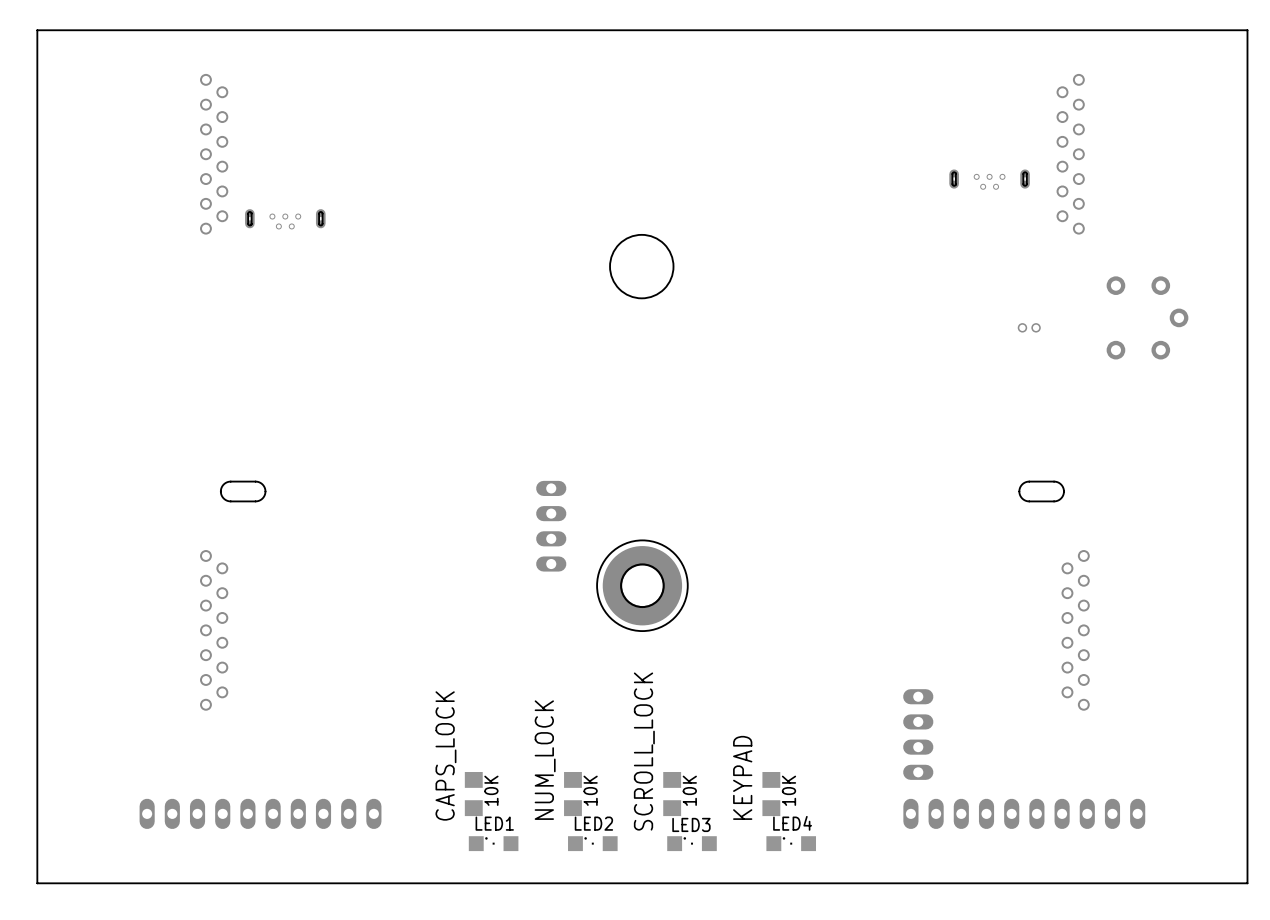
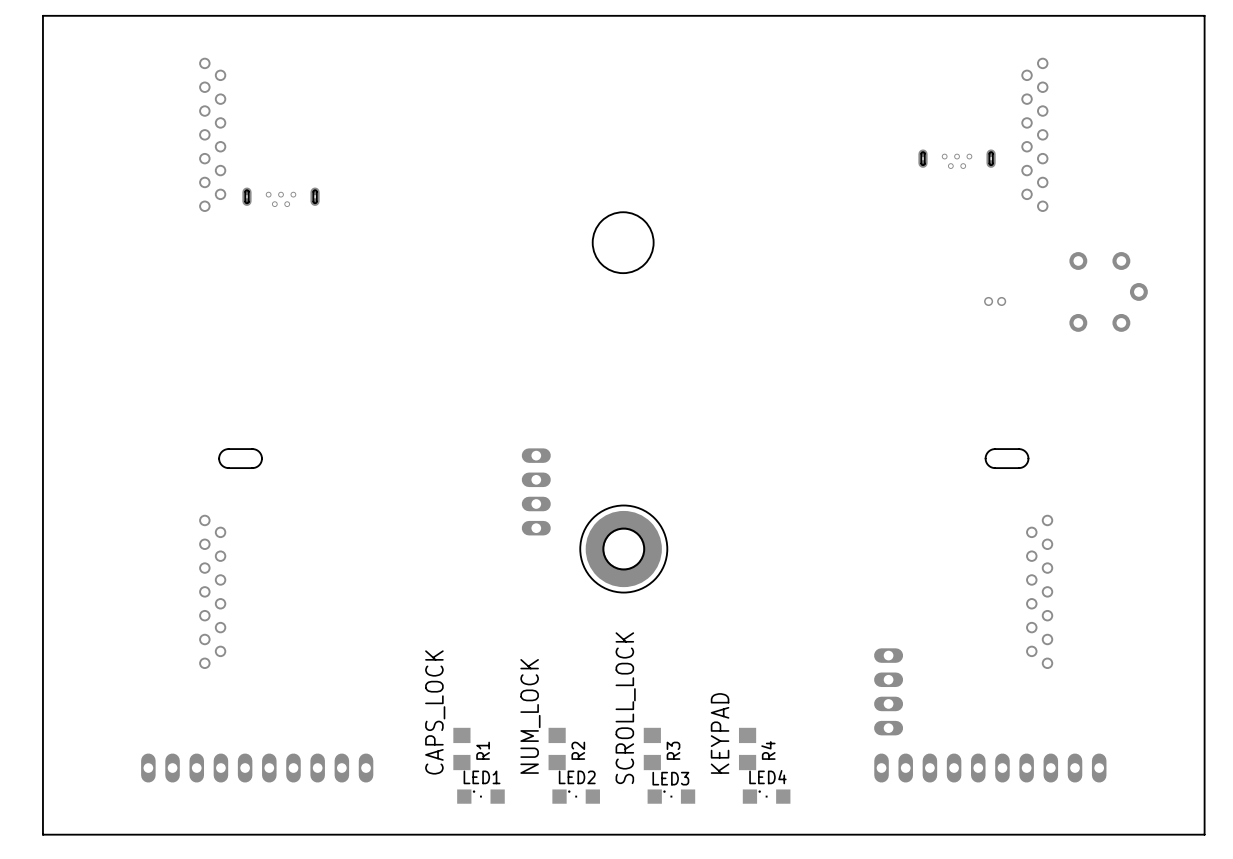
R1 value: 10K (491, 790) -> none
R2 value: 10K (590, 790) -> none
R3 value: 10K (689, 790) -> none
R4 value: 10K (789, 790) -> none
R1 name: none -> R1 (483, 750)
R2 name: none -> R2 (578, 750)
R3 name: none -> R3 (673, 750)
R4 name: none -> R4 (768, 750)

